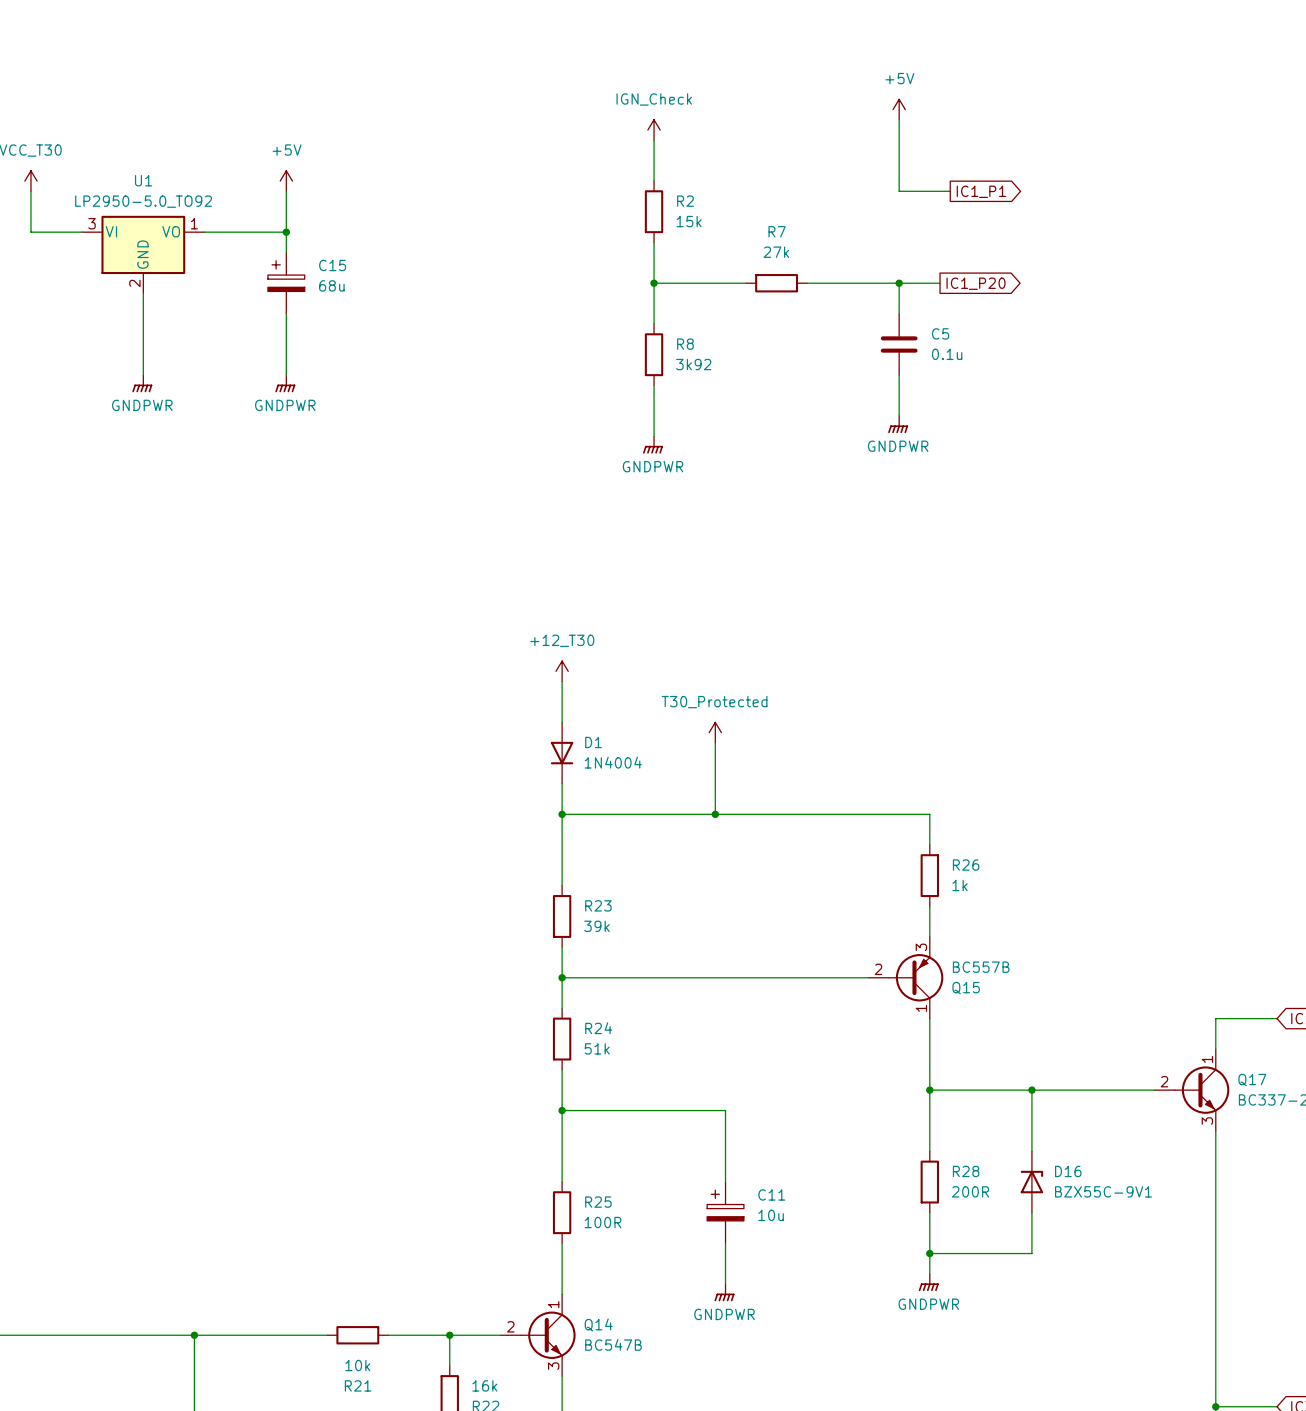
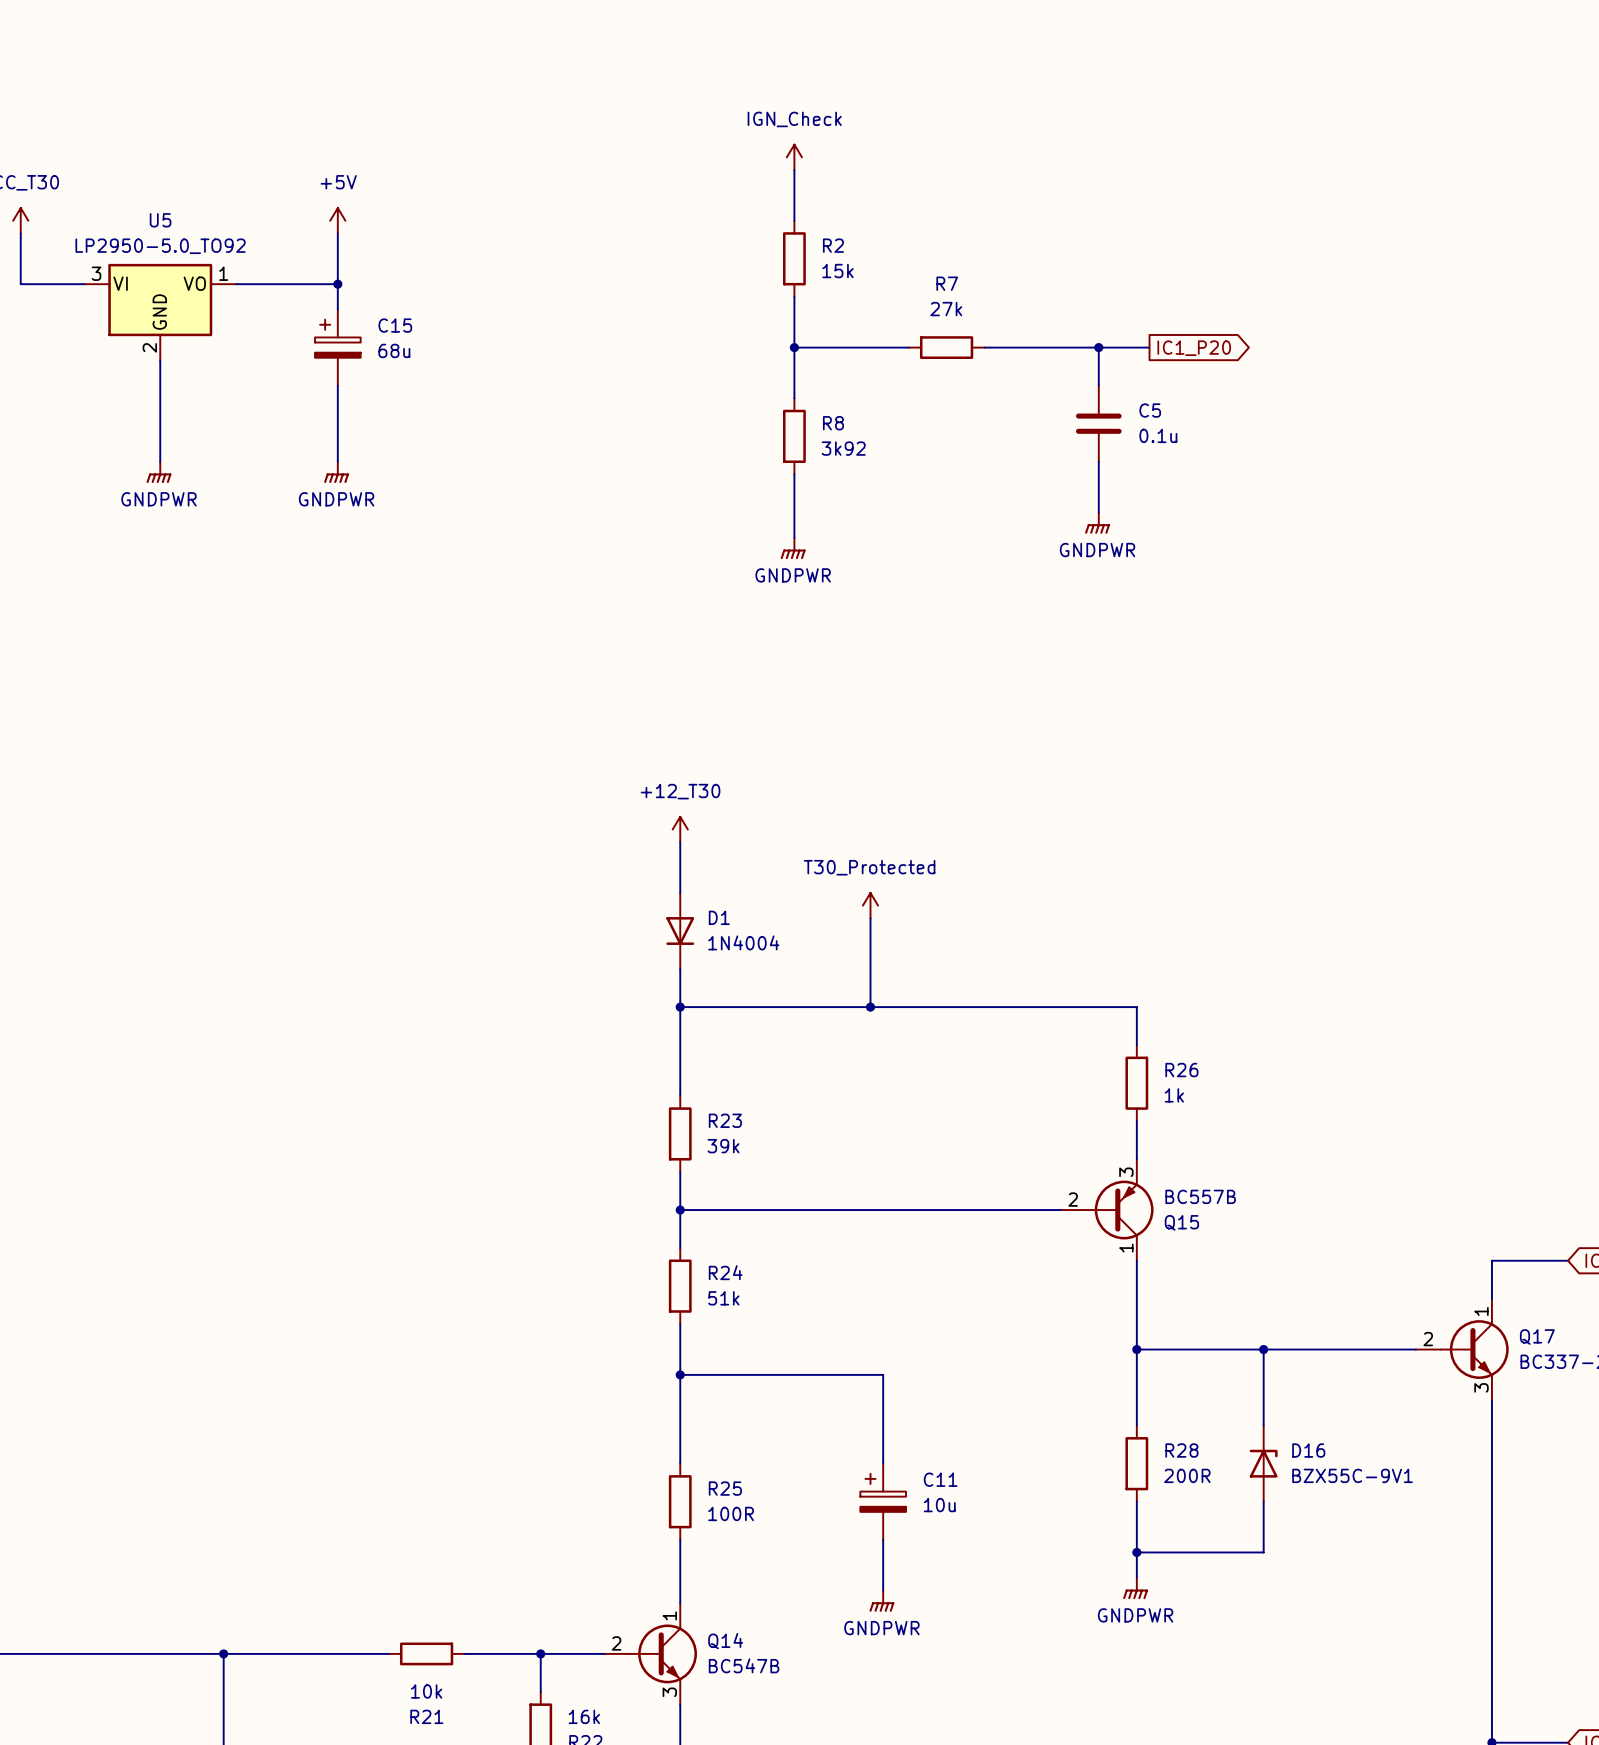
power symbol: +5V (899, 109) -> none
wire: (899, 119) (899, 191) (950, 191) -> none
U1 name: U1 (143, 180) -> U5 (160, 220)
global label: IC1_P1 (981, 191) -> none

